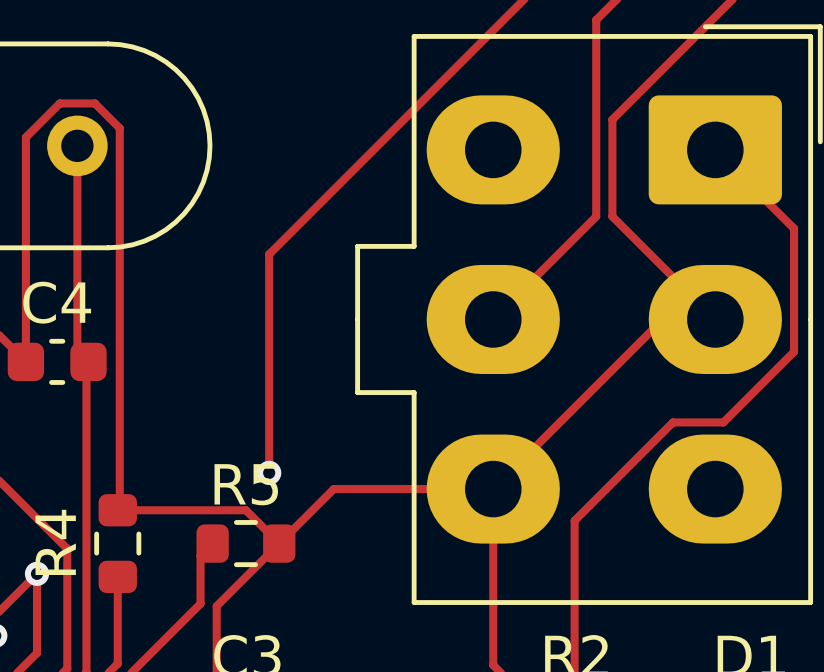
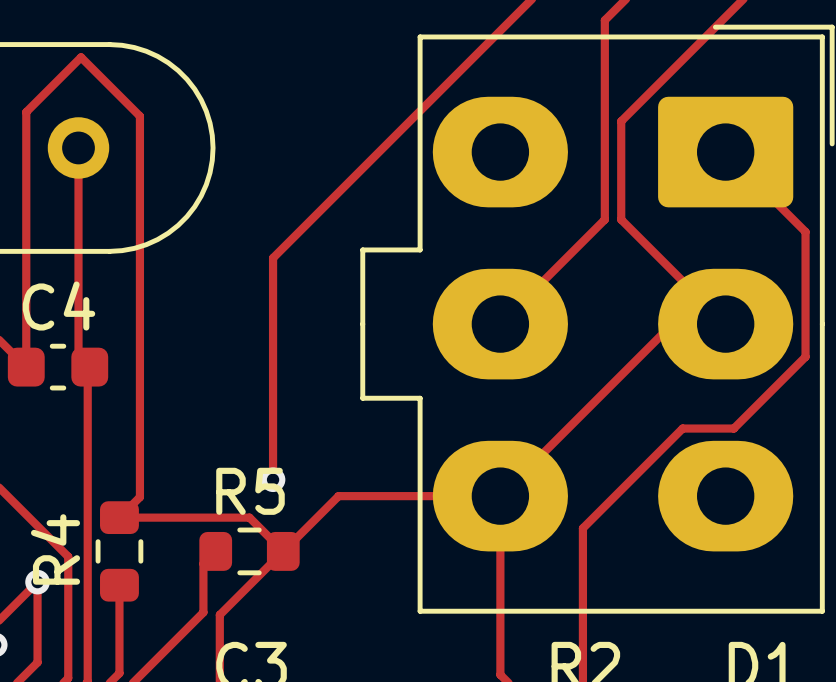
track: (25, 137) (59, 103) (94, 103) (119, 128) (119, 508) -> (26, 139) (26, 112) (81, 57) (139, 116) (139, 497) (121, 515)

